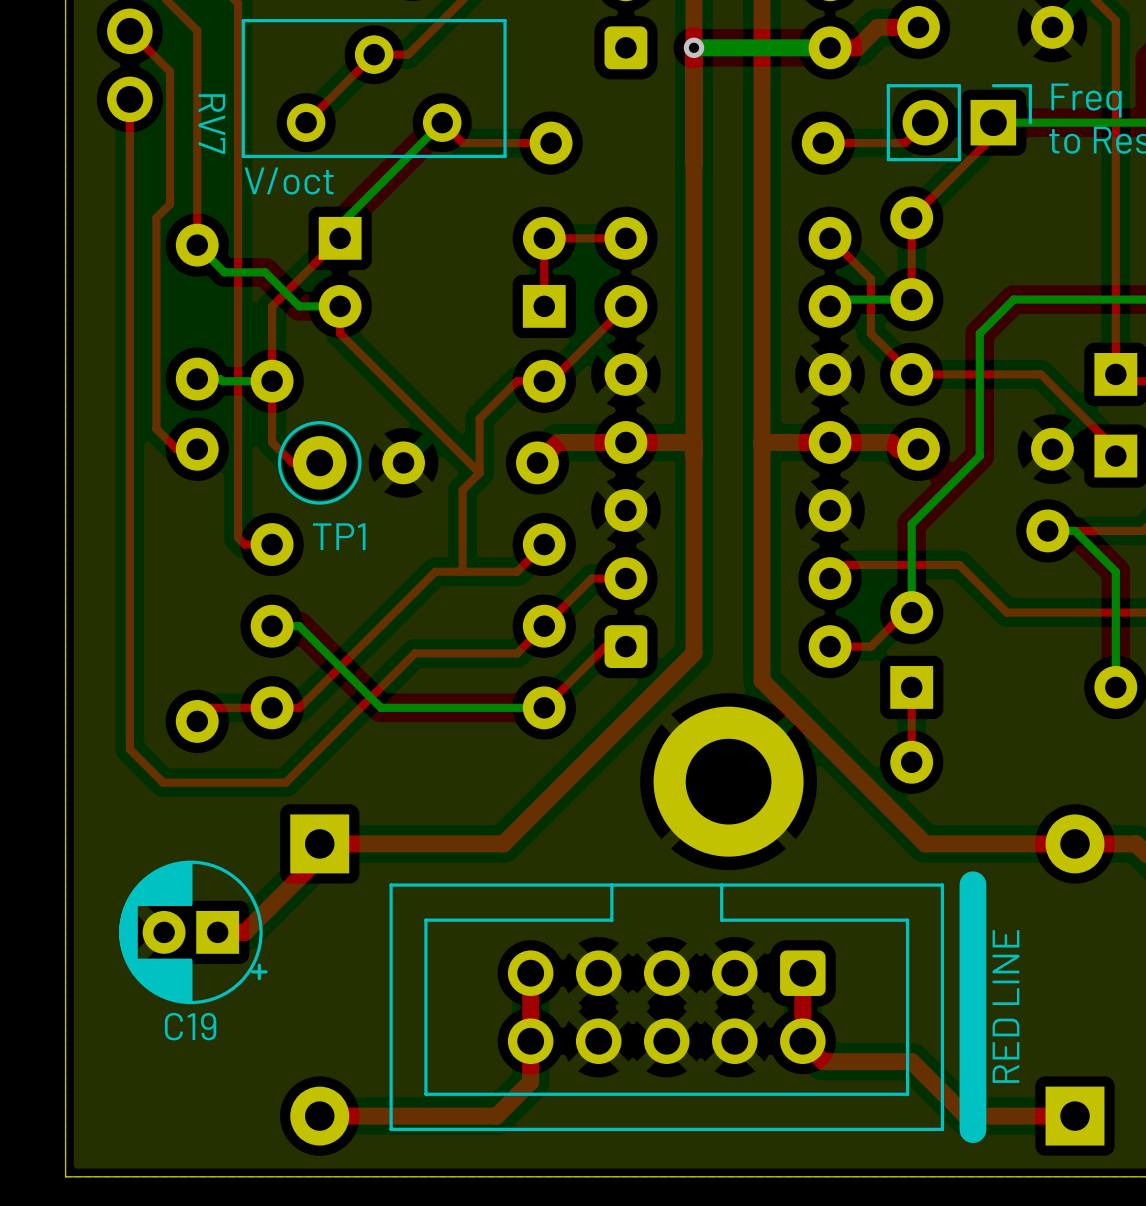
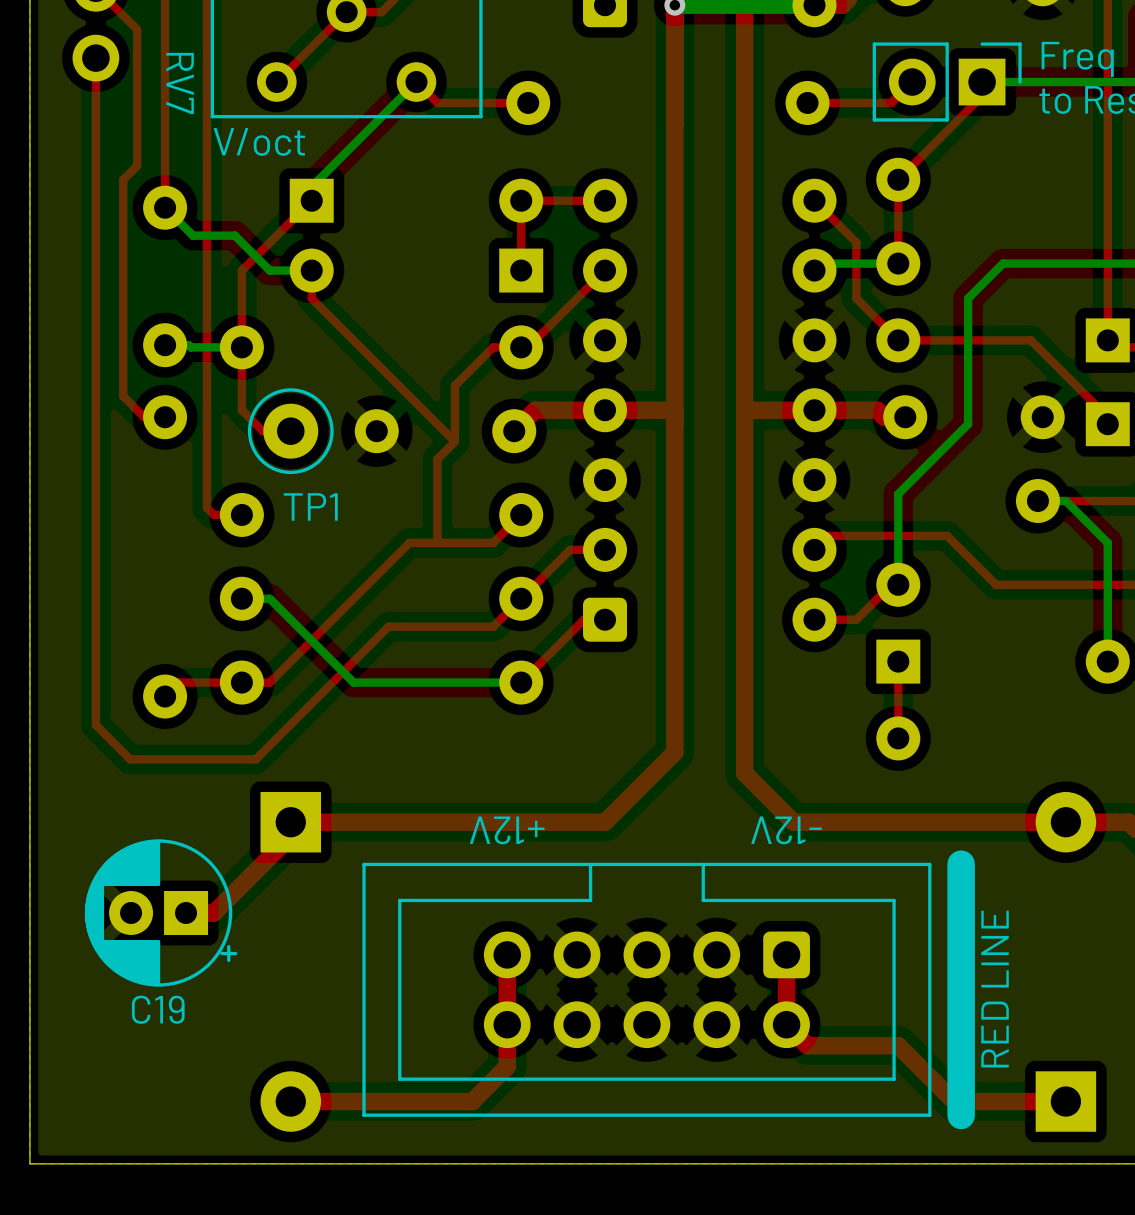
top track: (693, 653) (503, 843) -> (674, 626) (674, 752) (605, 822) (479, 822)
top track: (762, 680) (925, 843) -> (744, 654) (744, 773) (793, 822) (912, 822)
part: (728, 781) -> none
part text: none -> +12V (507, 830)
part text: none -> -12V (786, 830)

